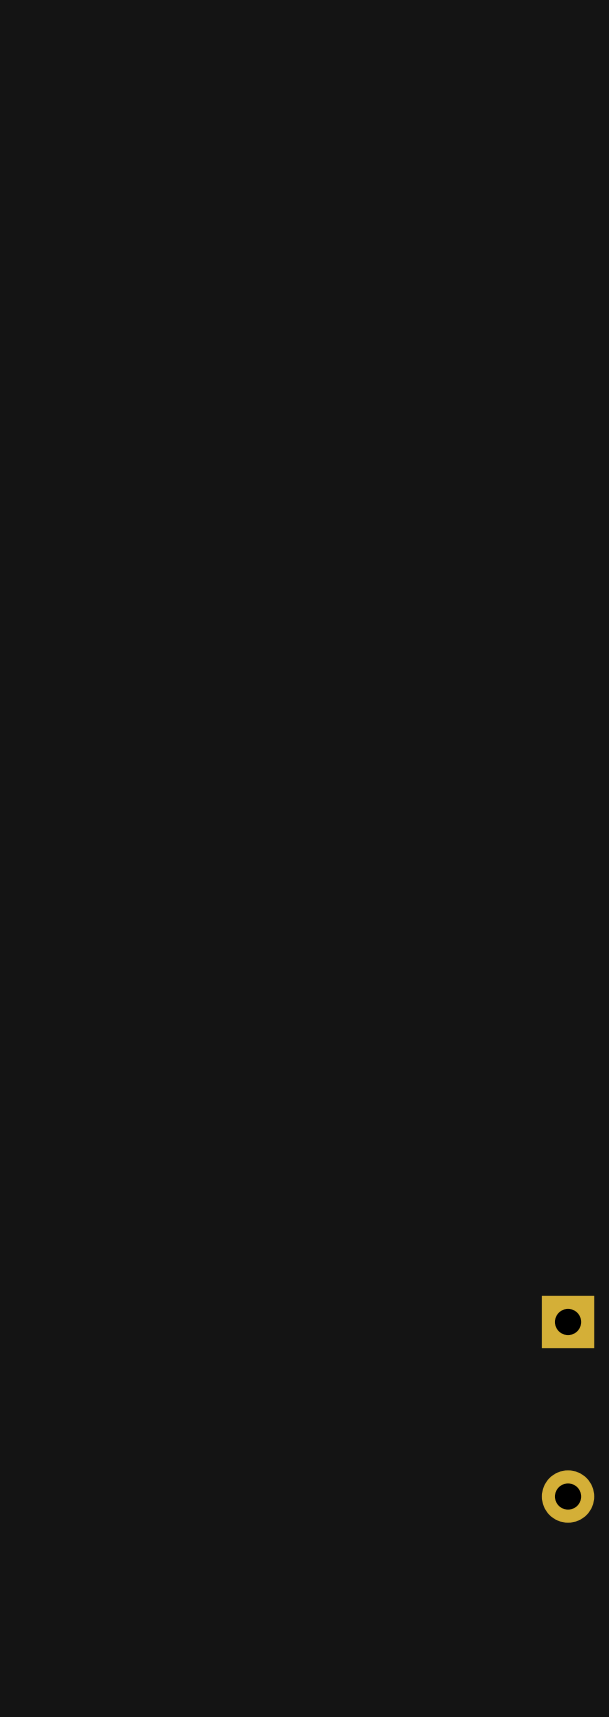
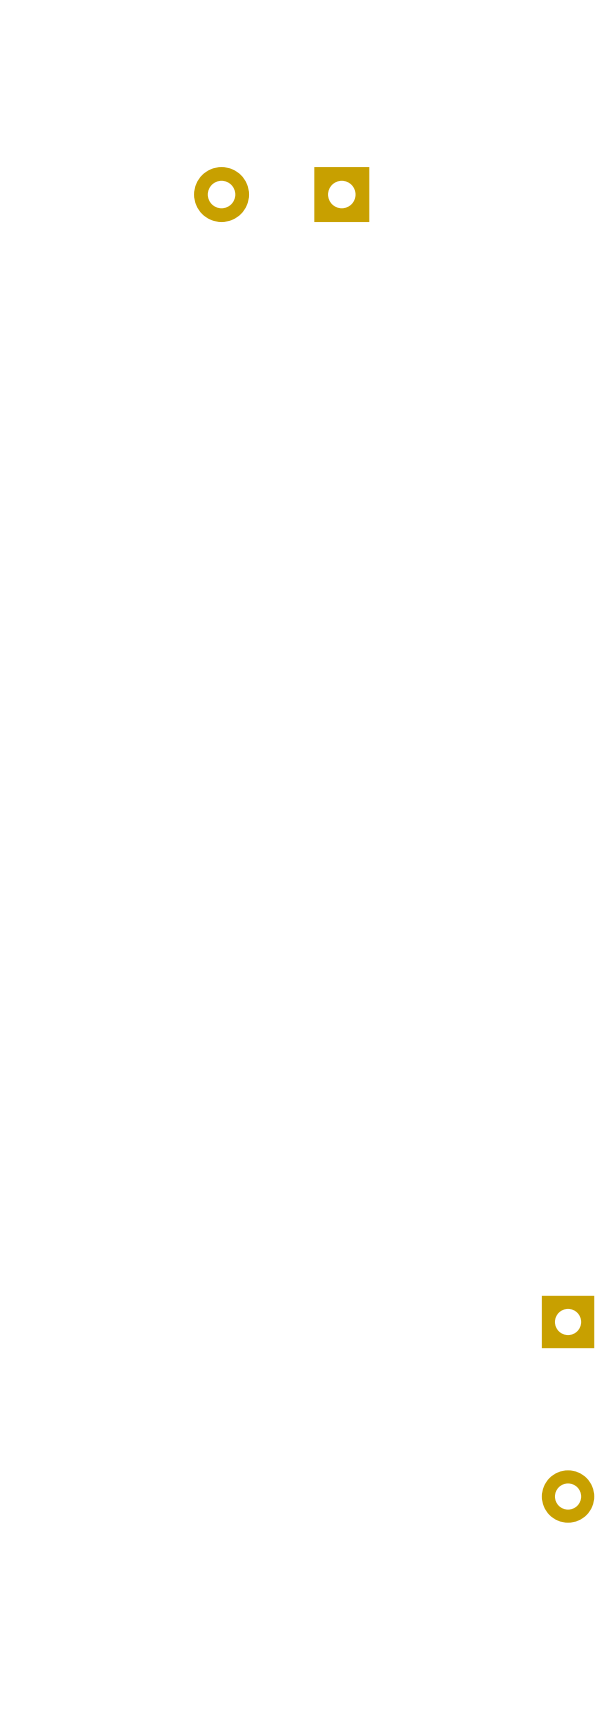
part: none -> (281, 194)

